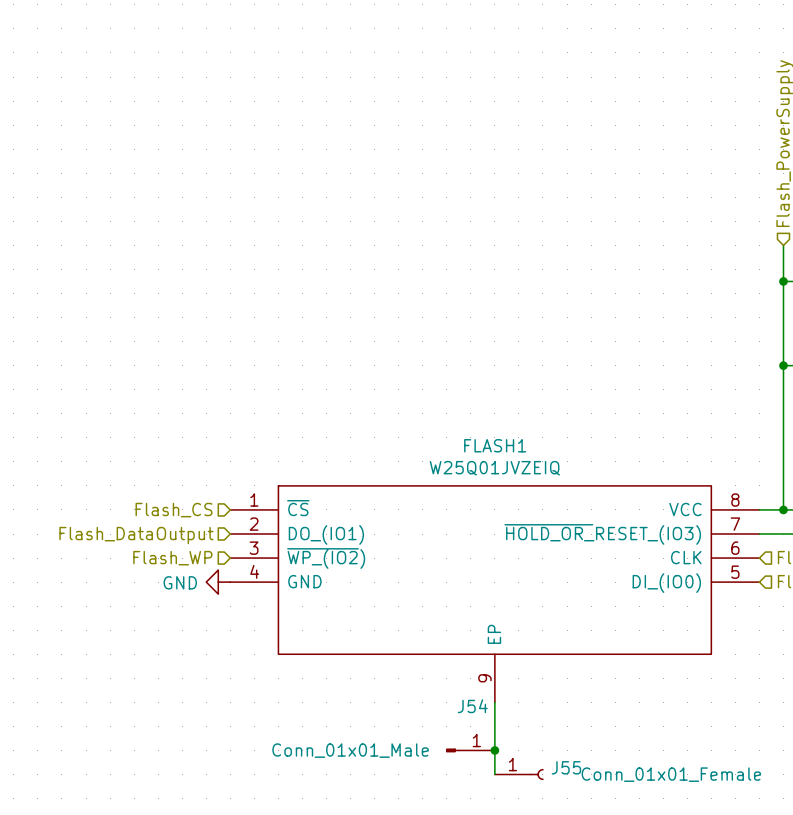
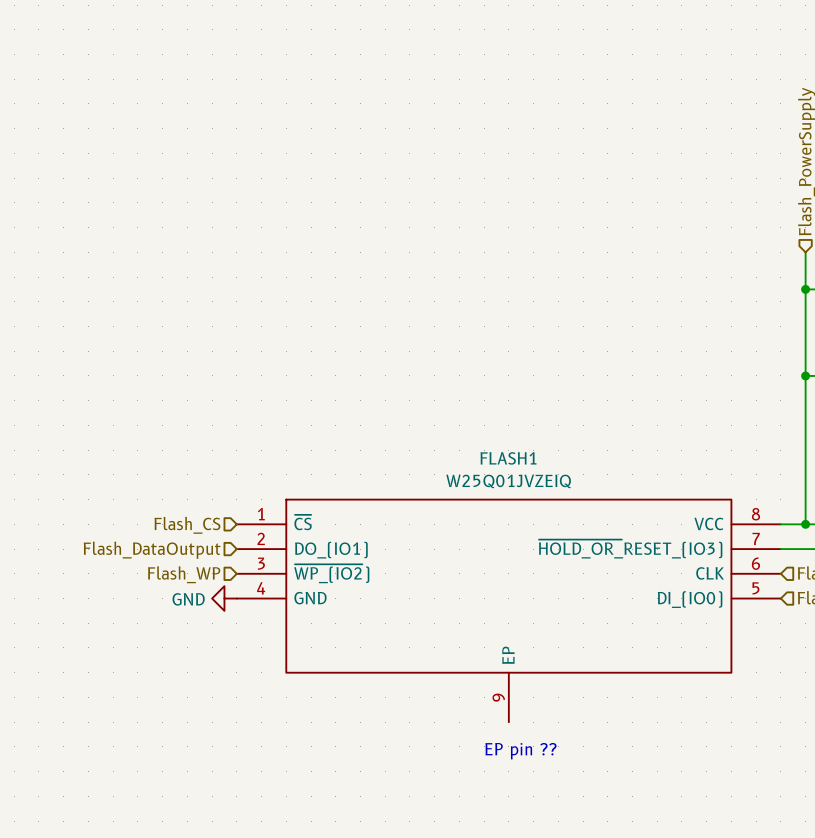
wire: (494, 702) (494, 774) -> none
text: none -> EP pin ?? (520, 751)
J54: Conn_01x01_Male (470, 750) -> none
junction: (494, 750) -> none
J55: Conn_01x01_Female (519, 774) -> none

